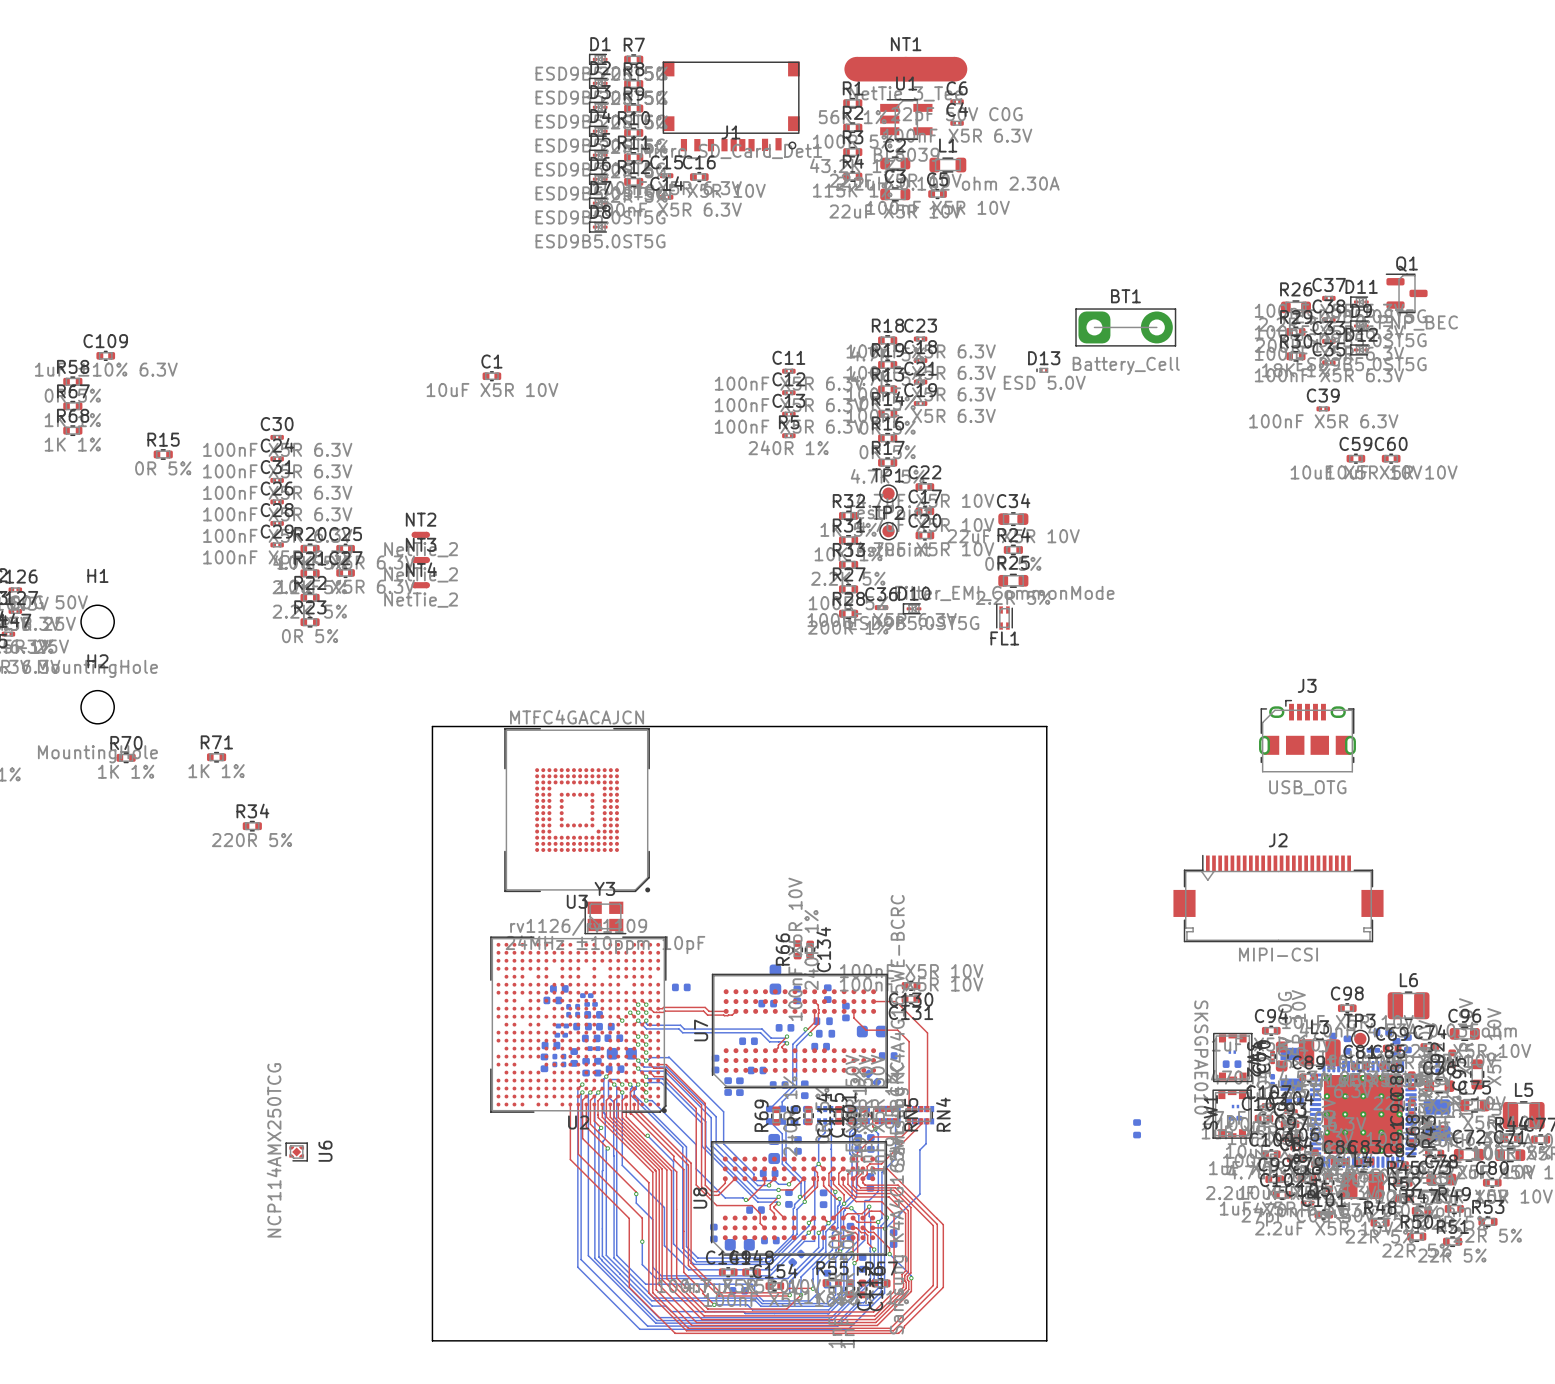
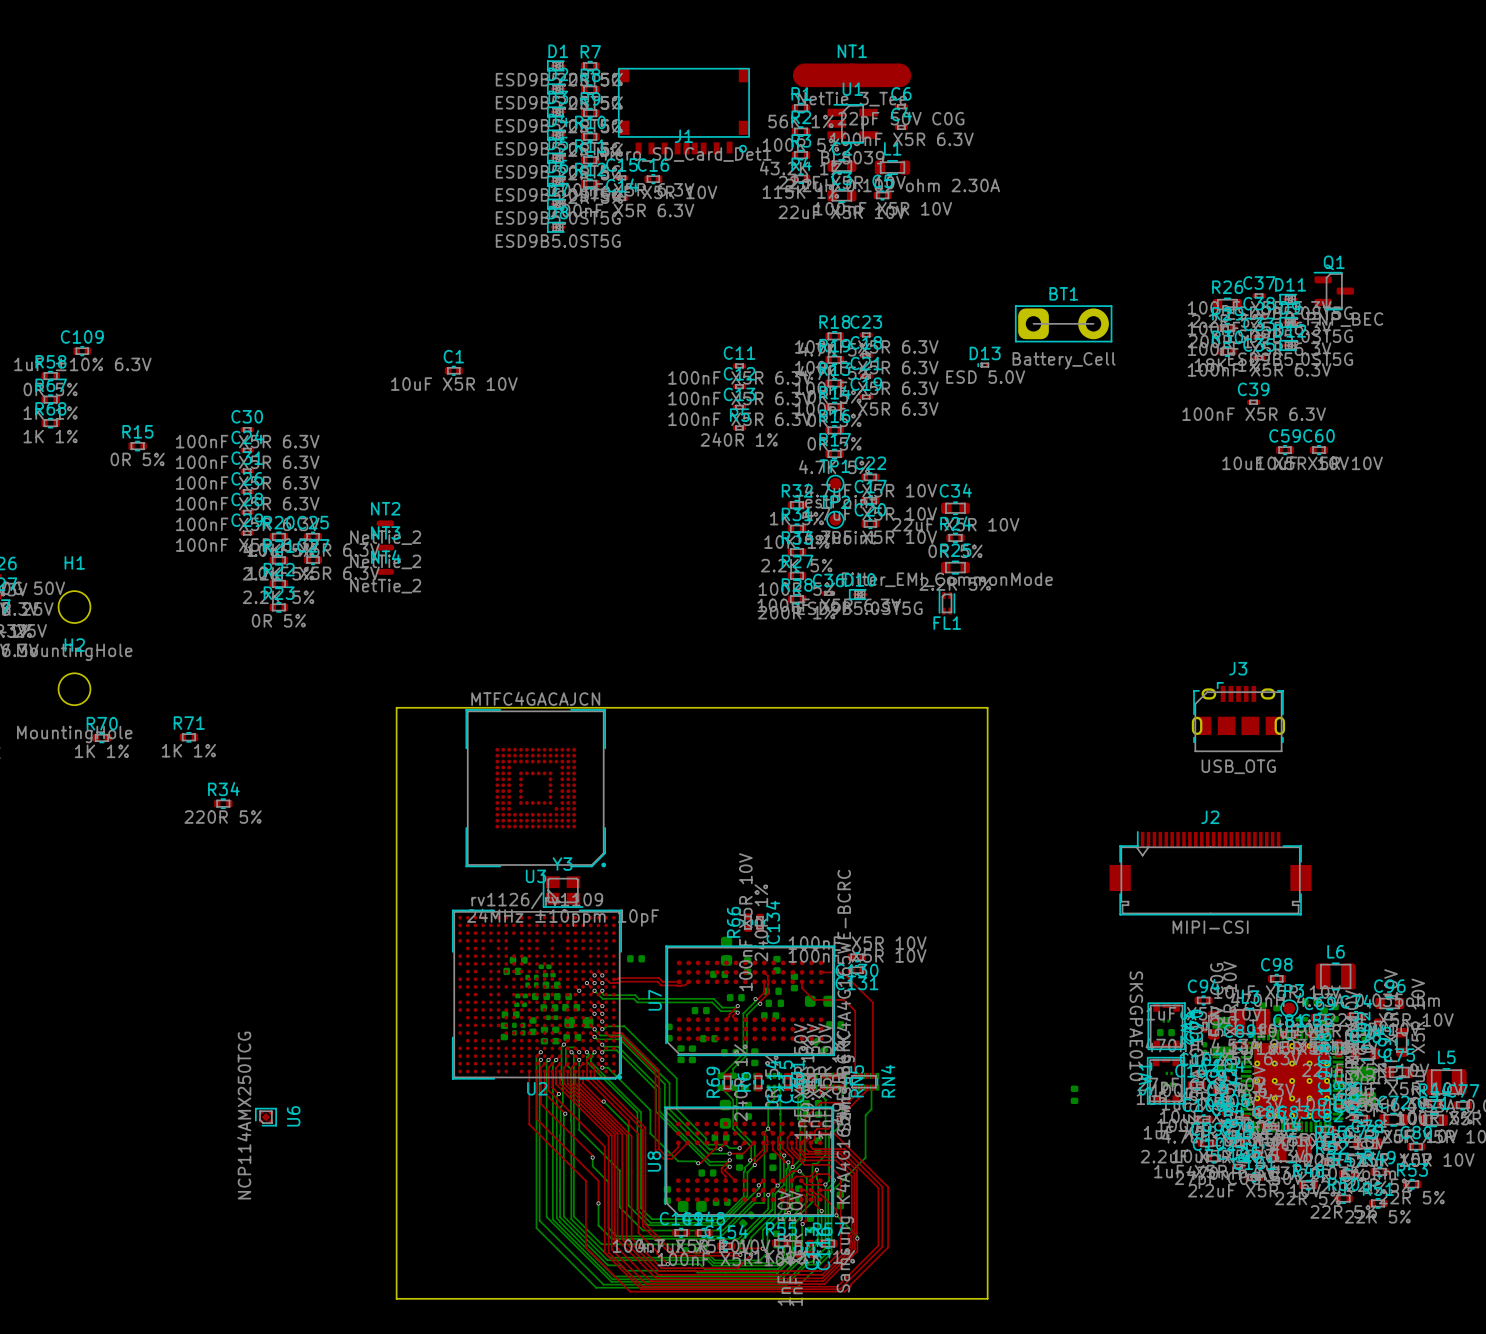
top track: (650, 1072) (654, 1076) (664, 1076) (696, 1108) (696, 1185) (716, 1205) (752, 1205) (760, 1213) (760, 1223) (764, 1227) -> none

